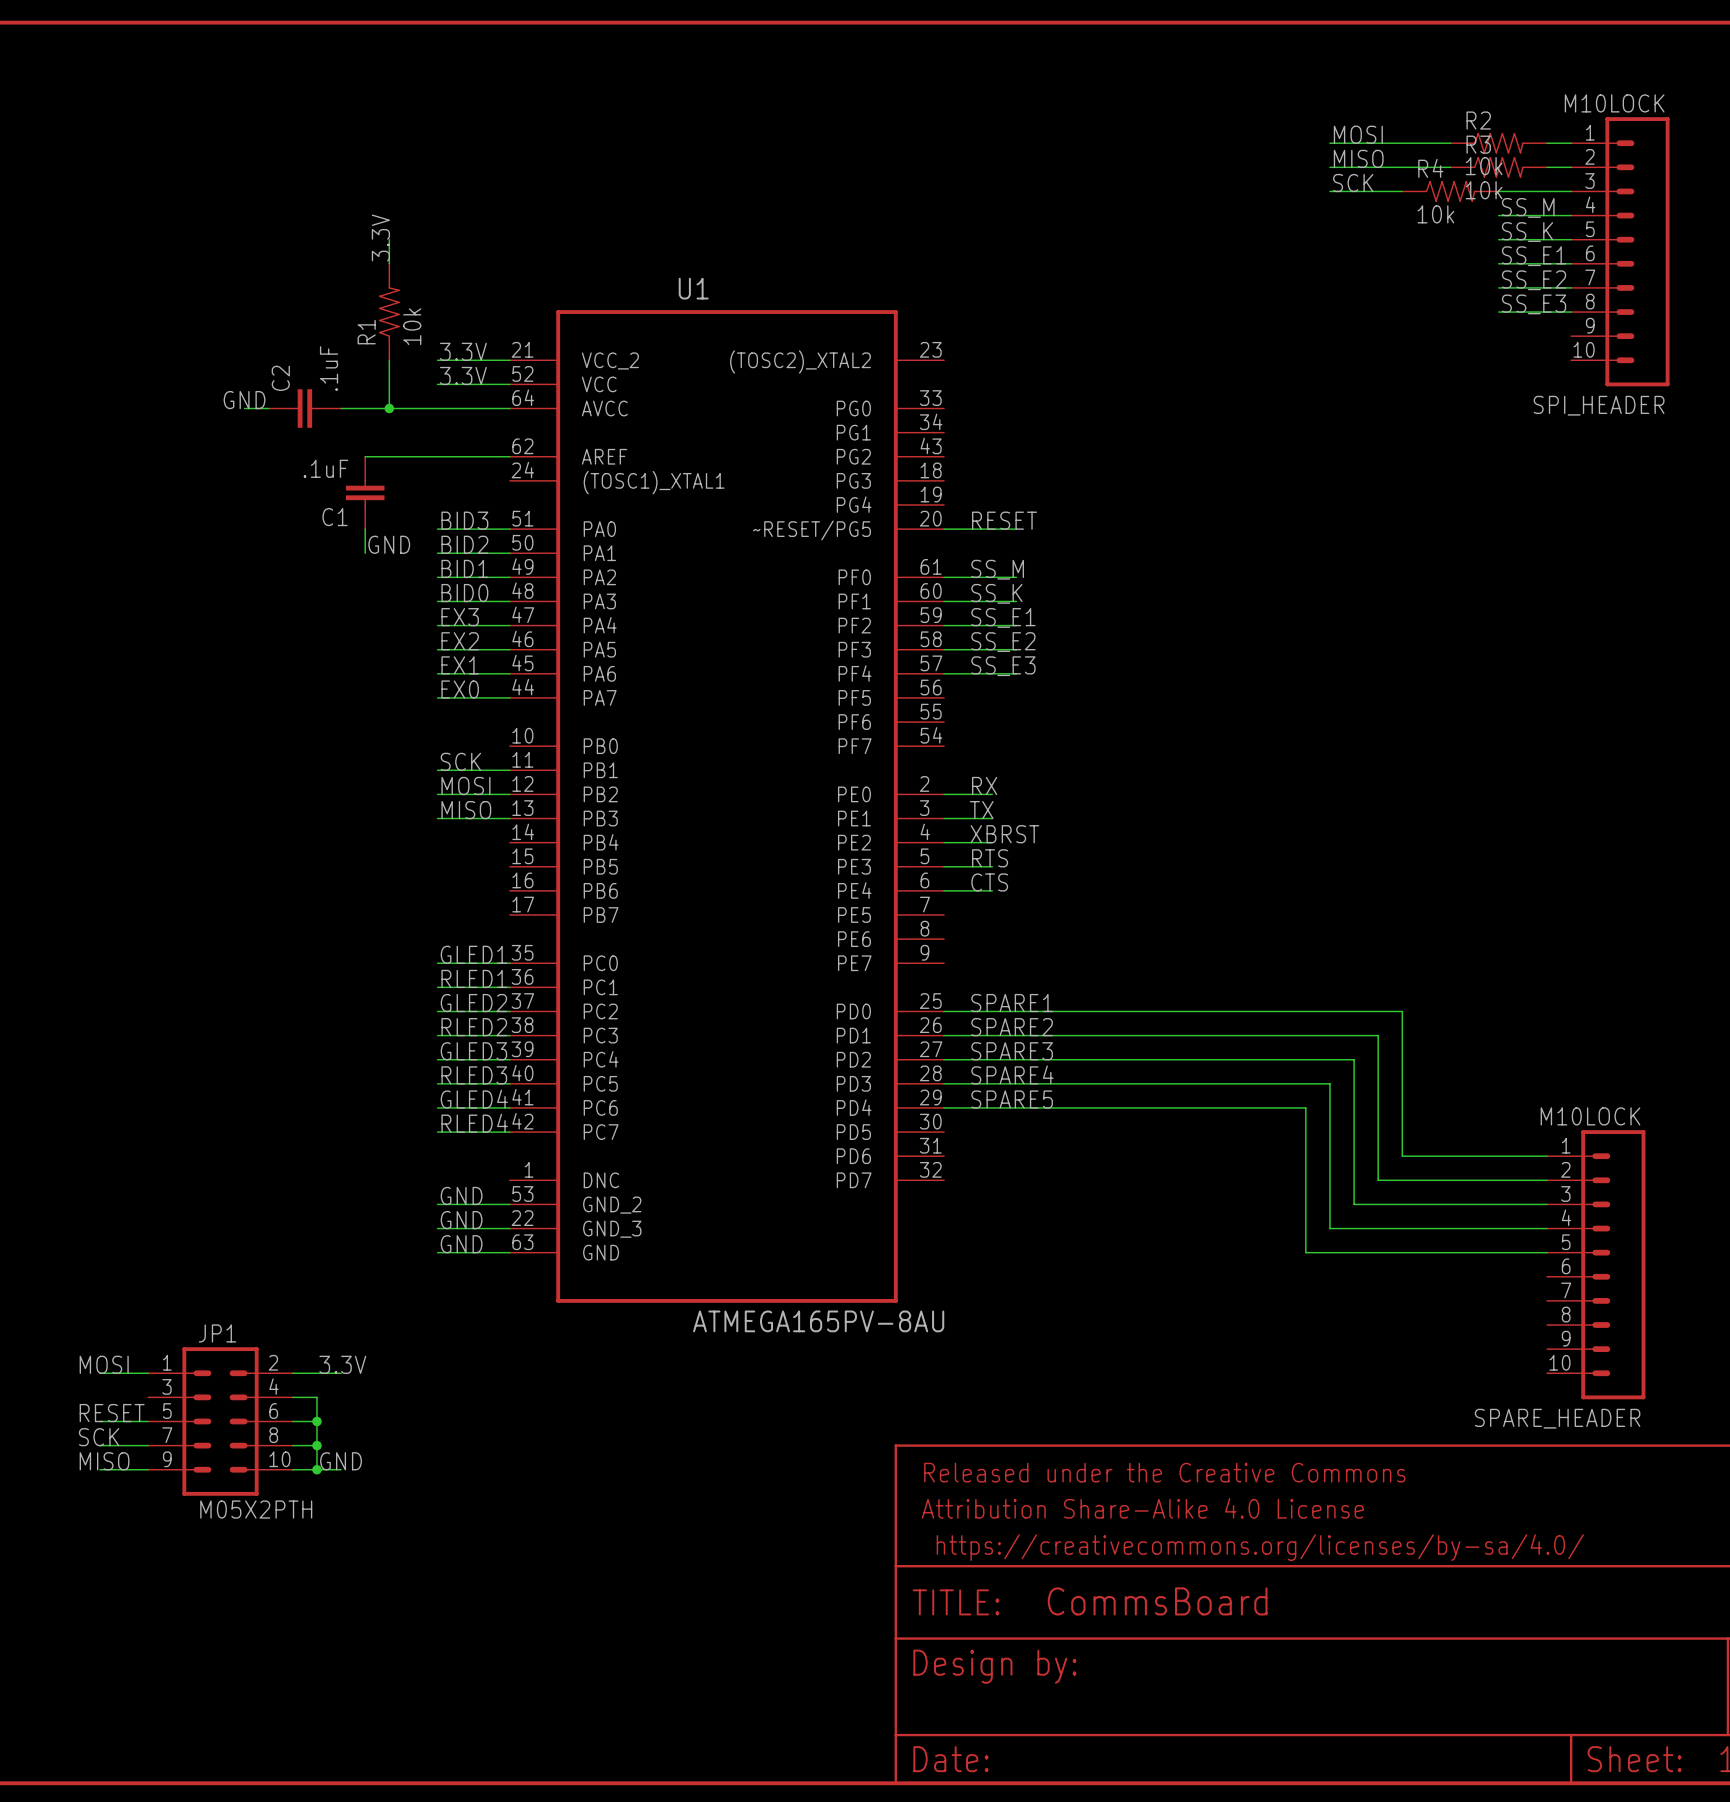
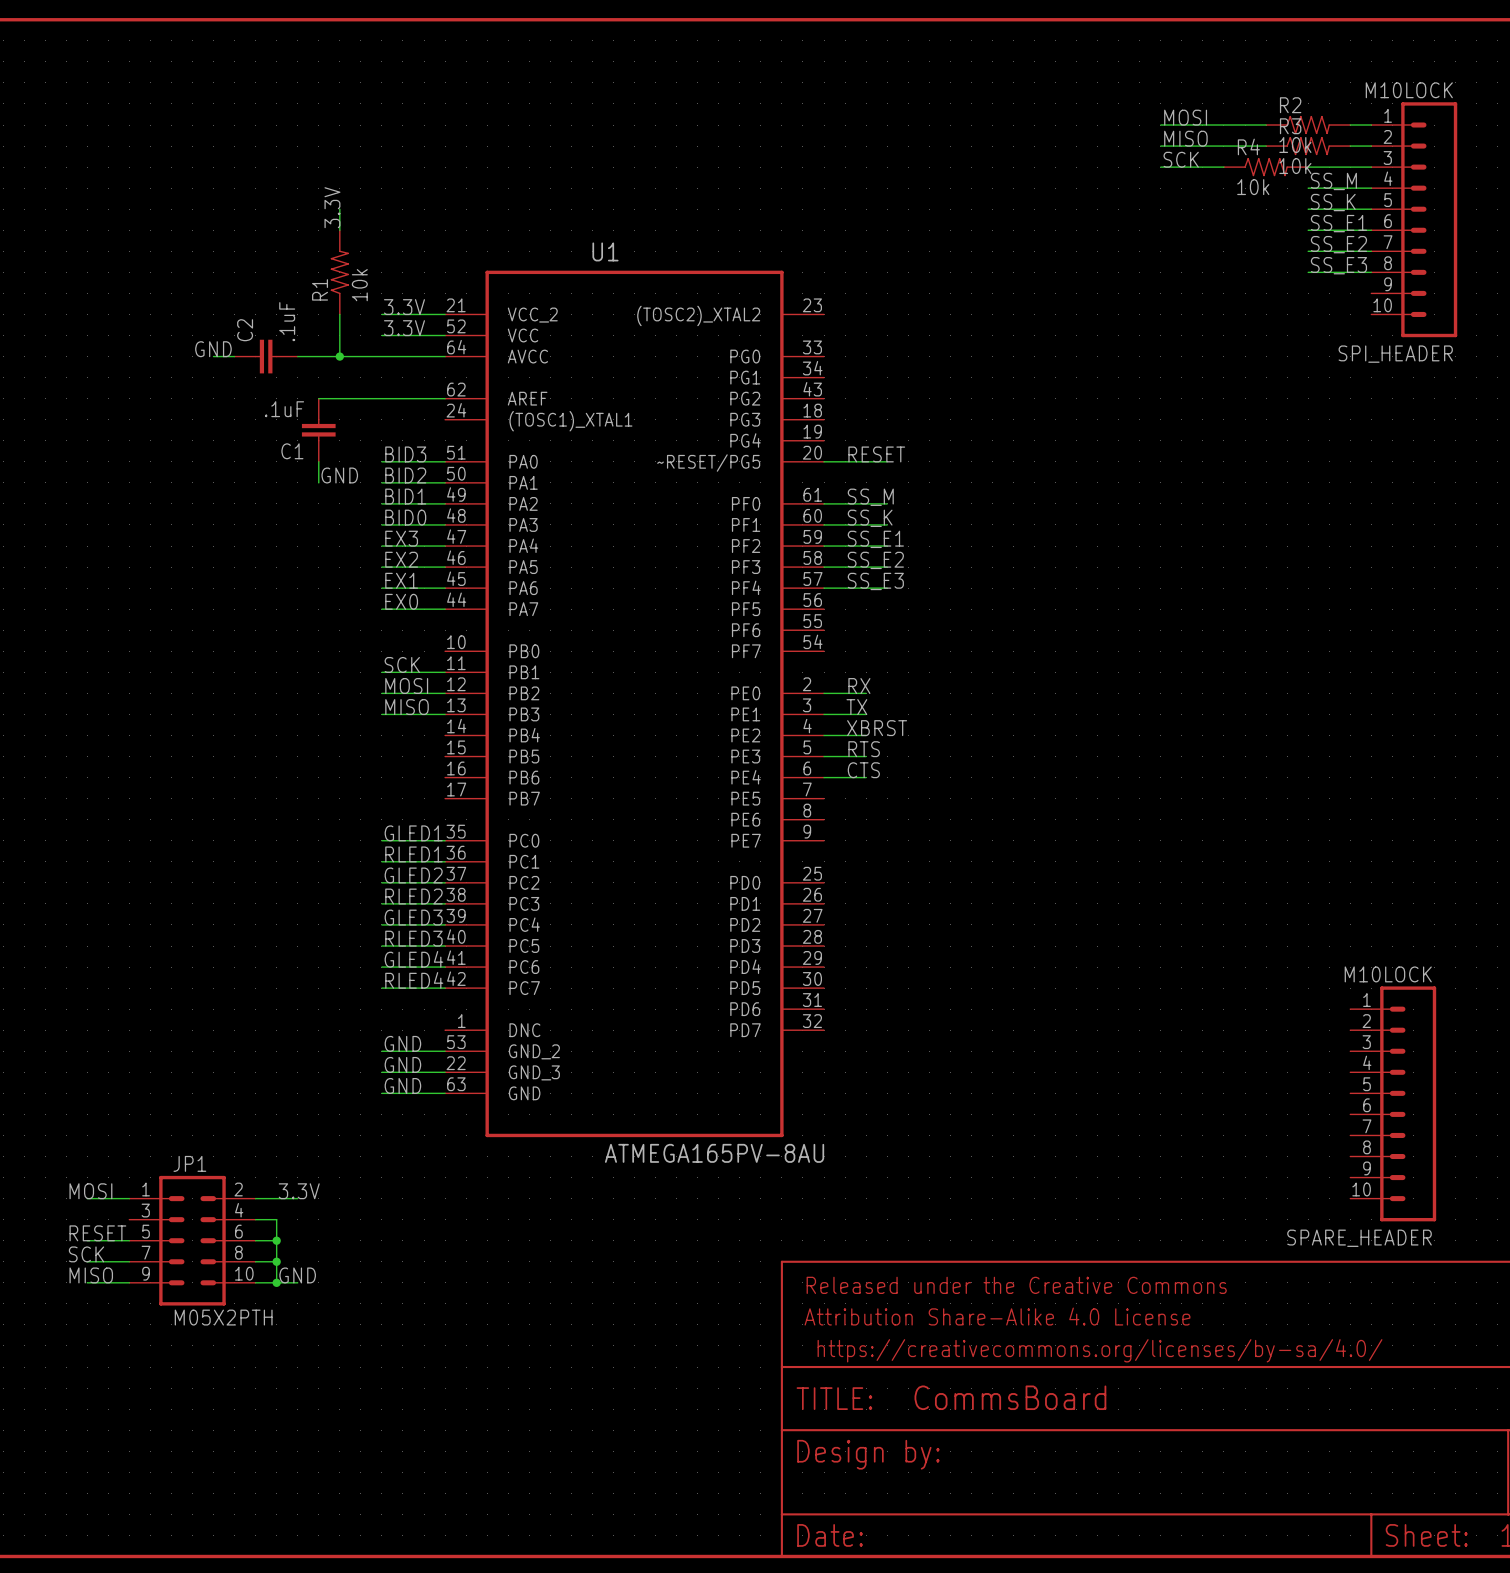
label: SPARE1 (1012, 1003) -> none
wire: (944, 1011) (1402, 1011) (1402, 1156) (1547, 1156) -> none
label: SPARE2 (1012, 1027) -> none
wire: (944, 1035) (1378, 1035) (1378, 1180) (1547, 1180) -> none
label: SPARE3 (1012, 1051) -> none
wire: (944, 1059) (1354, 1059) (1354, 1204) (1547, 1204) -> none
label: SPARE4 (1012, 1074) -> none
wire: (944, 1083) (1329, 1083) (1329, 1228) (1547, 1228) -> none
label: SPARE5 (1012, 1099) -> none
wire: (944, 1107) (1305, 1107) (1305, 1252) (1547, 1252) -> none

